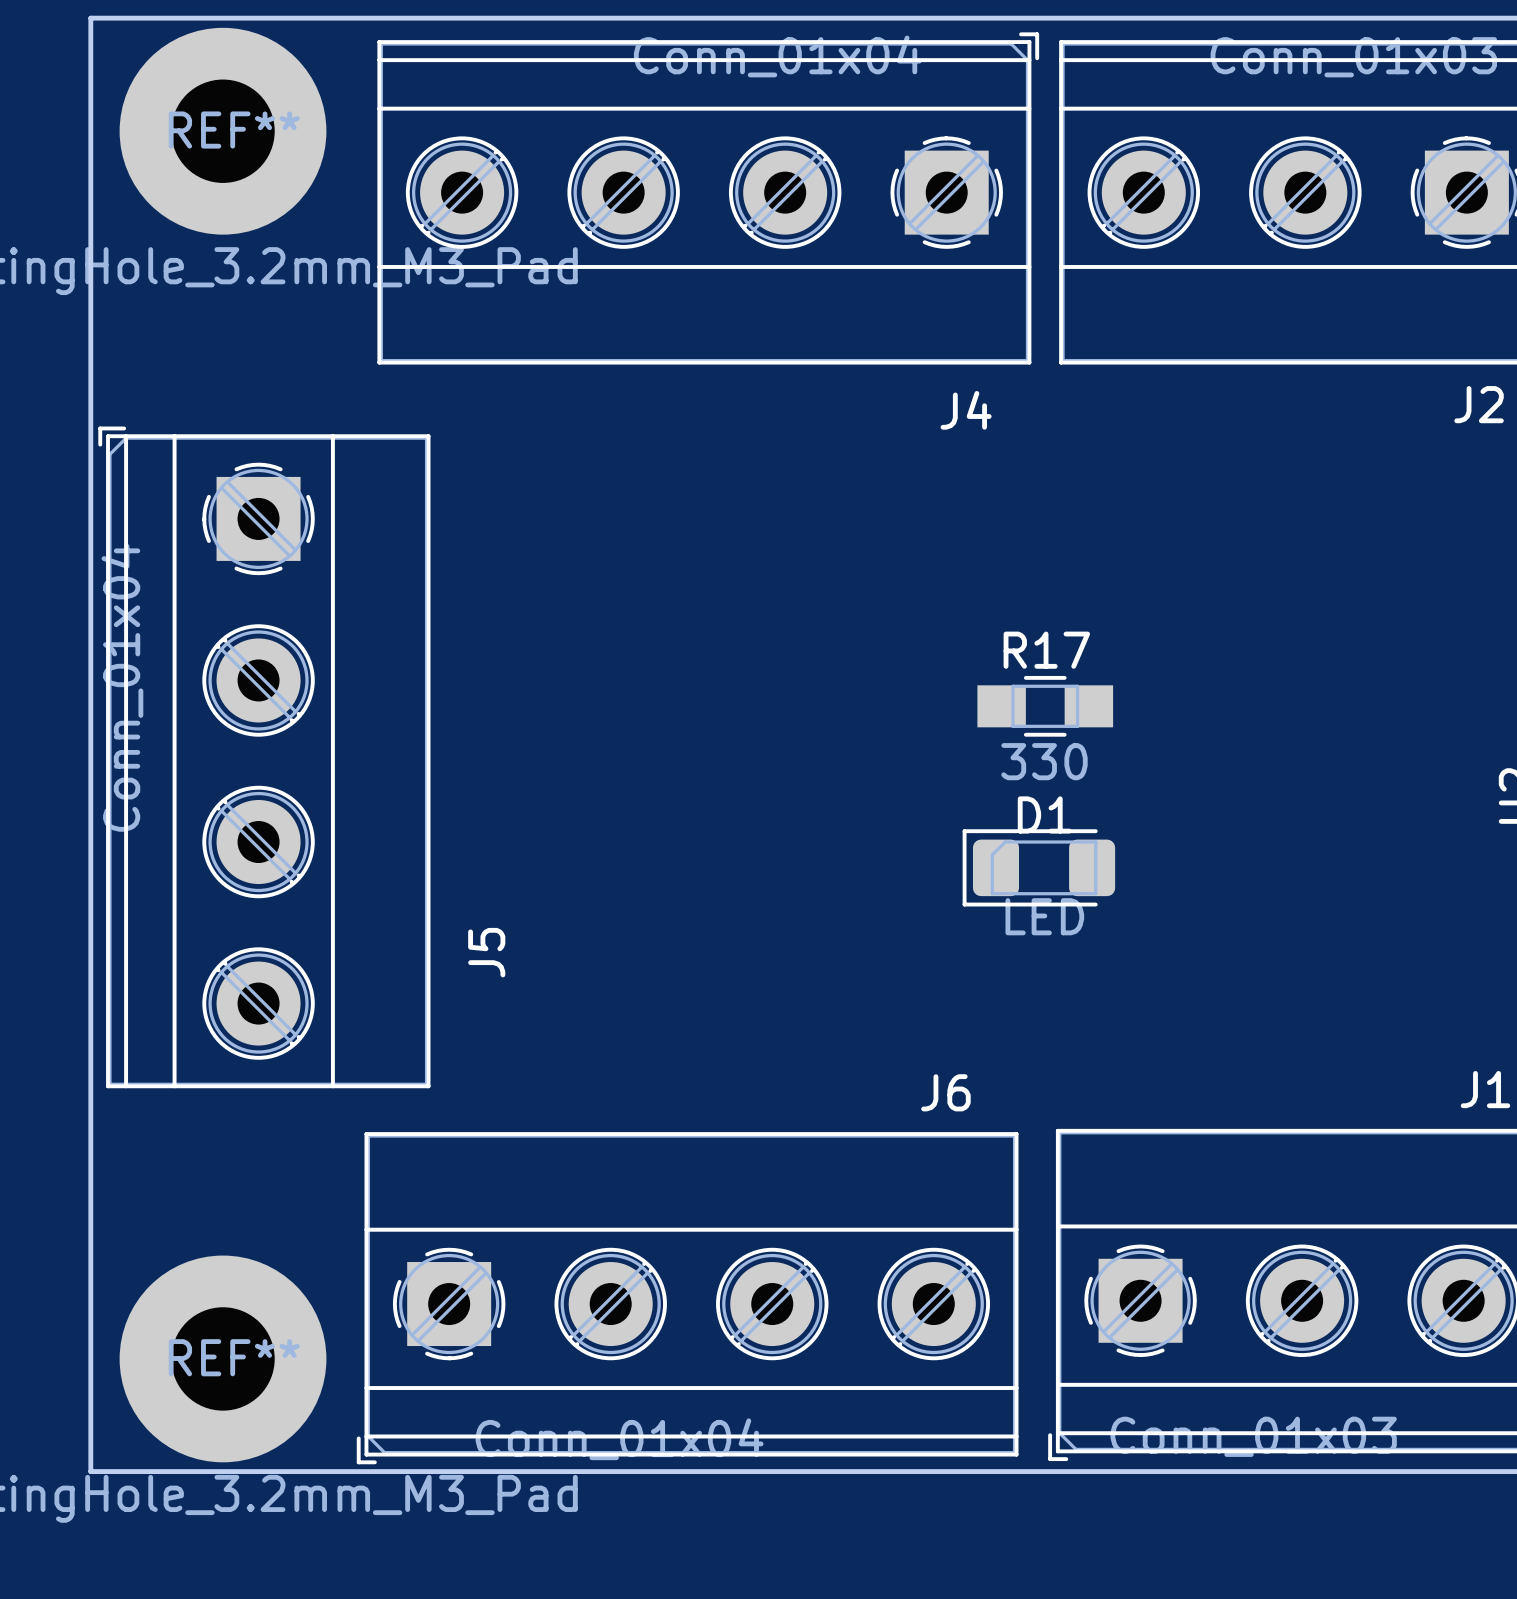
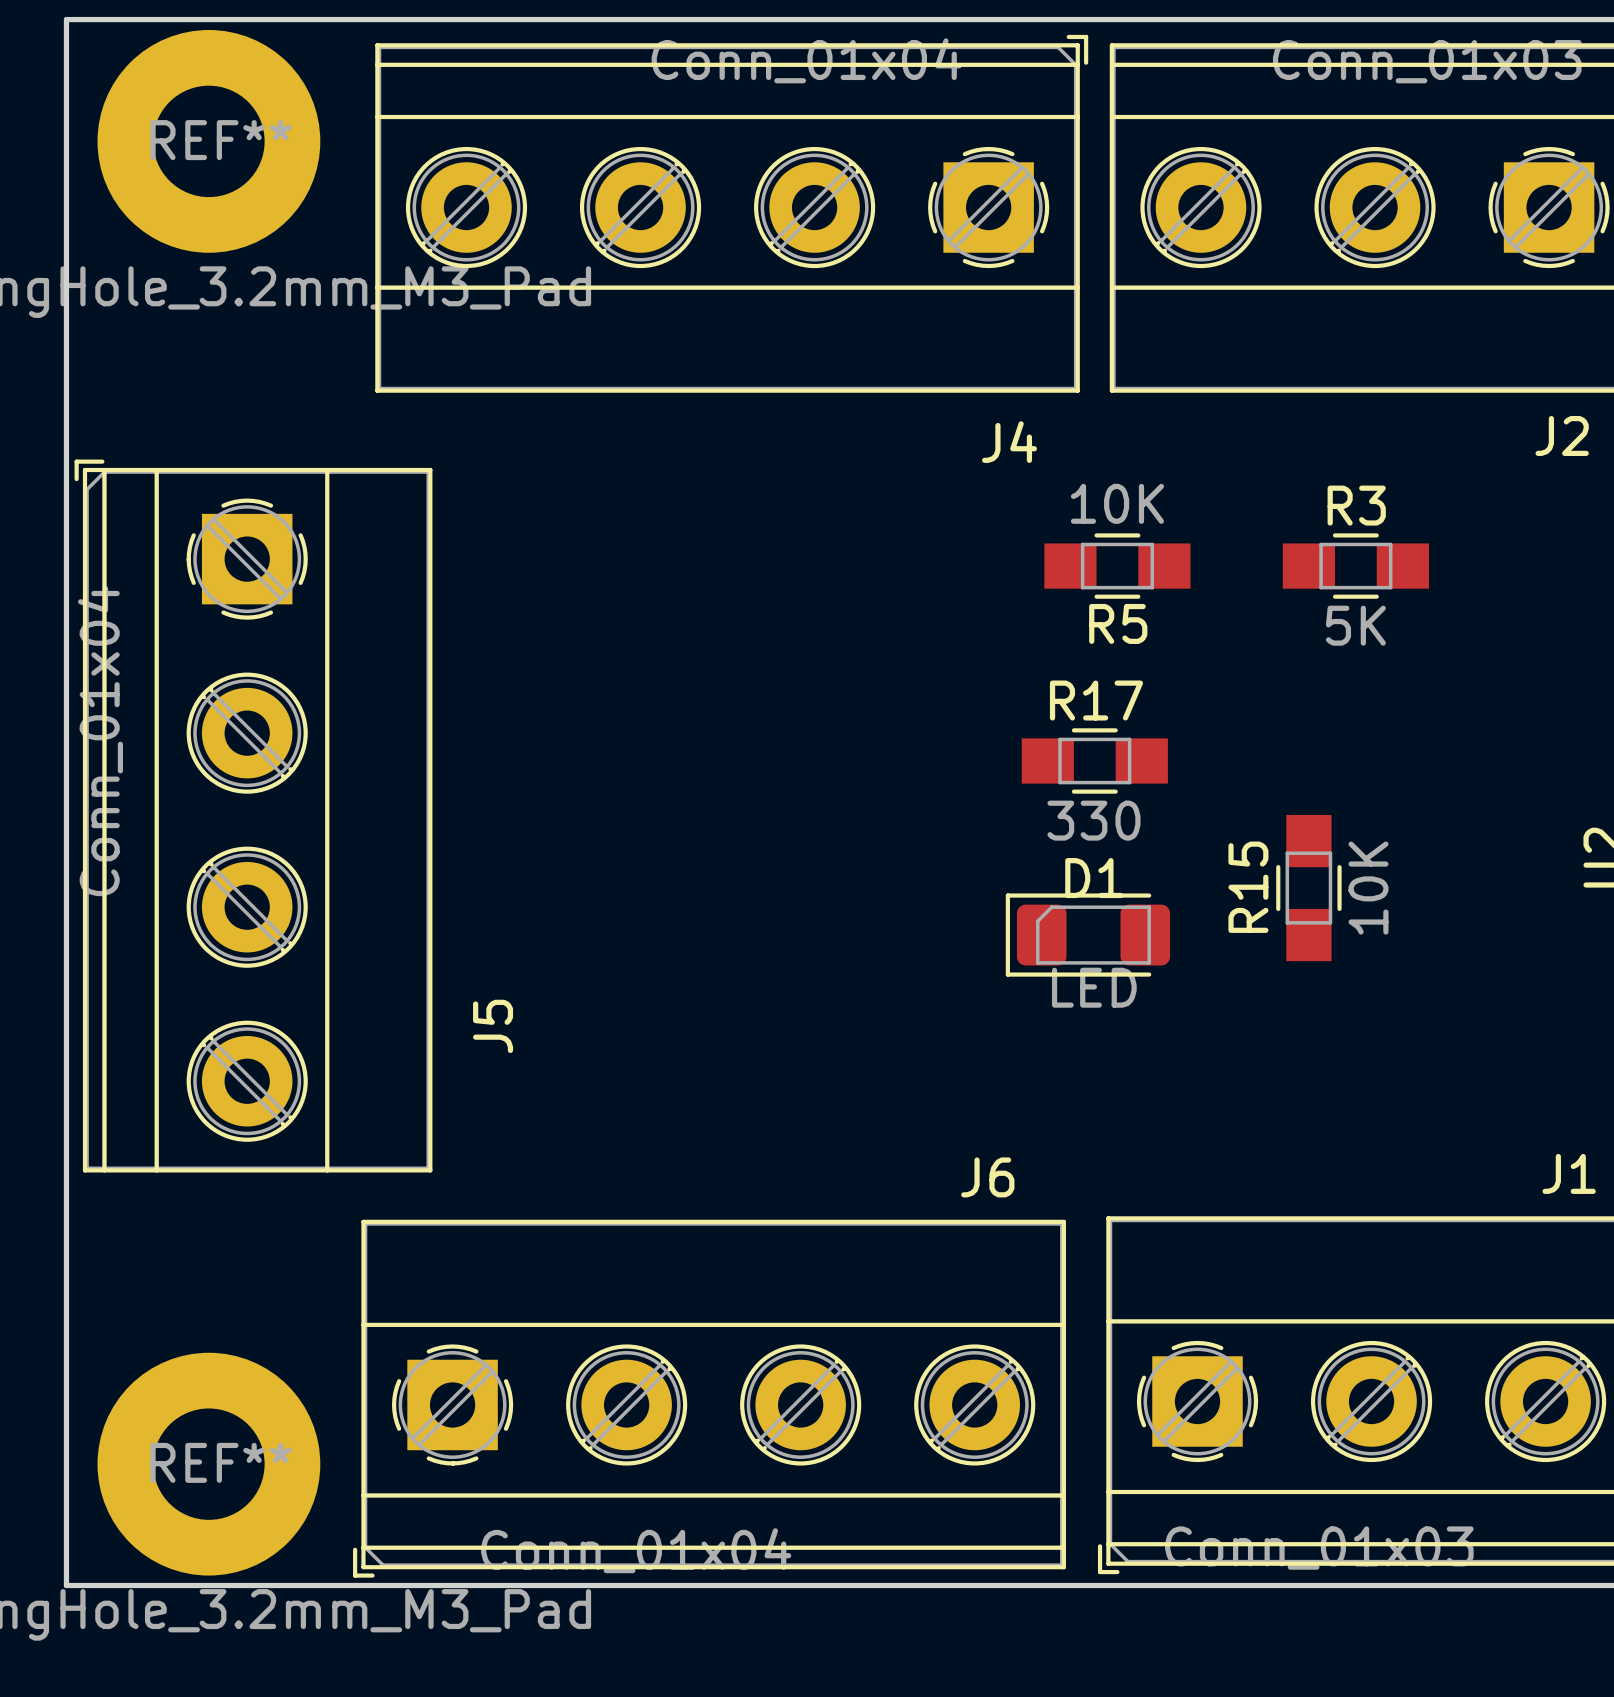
R5: none -> 10K (1117, 566)
R3: none -> 5K (1355, 566)
R15: none -> 10K (1308, 888)

